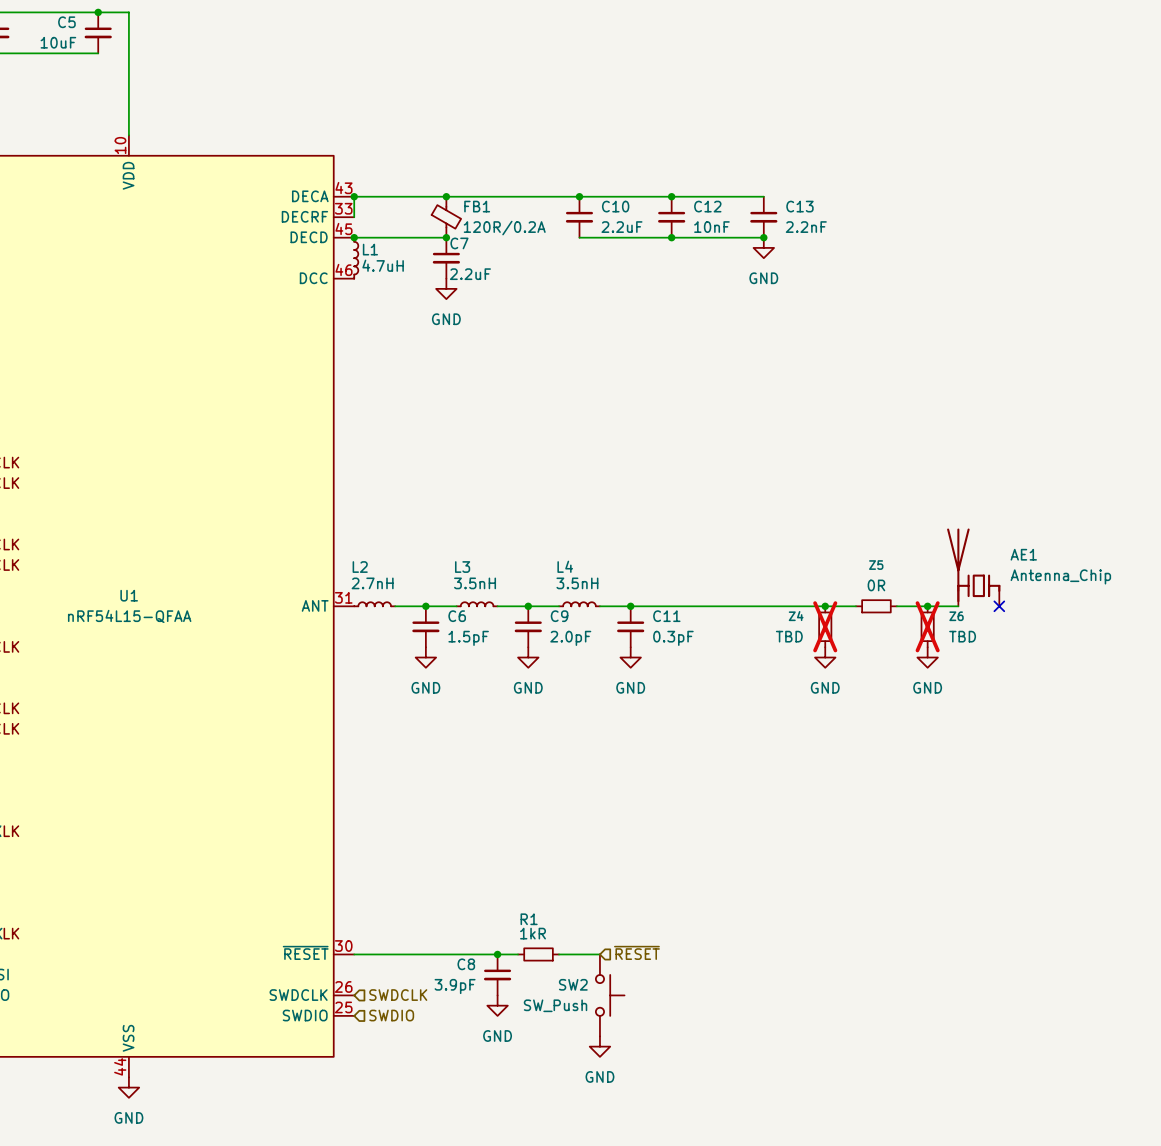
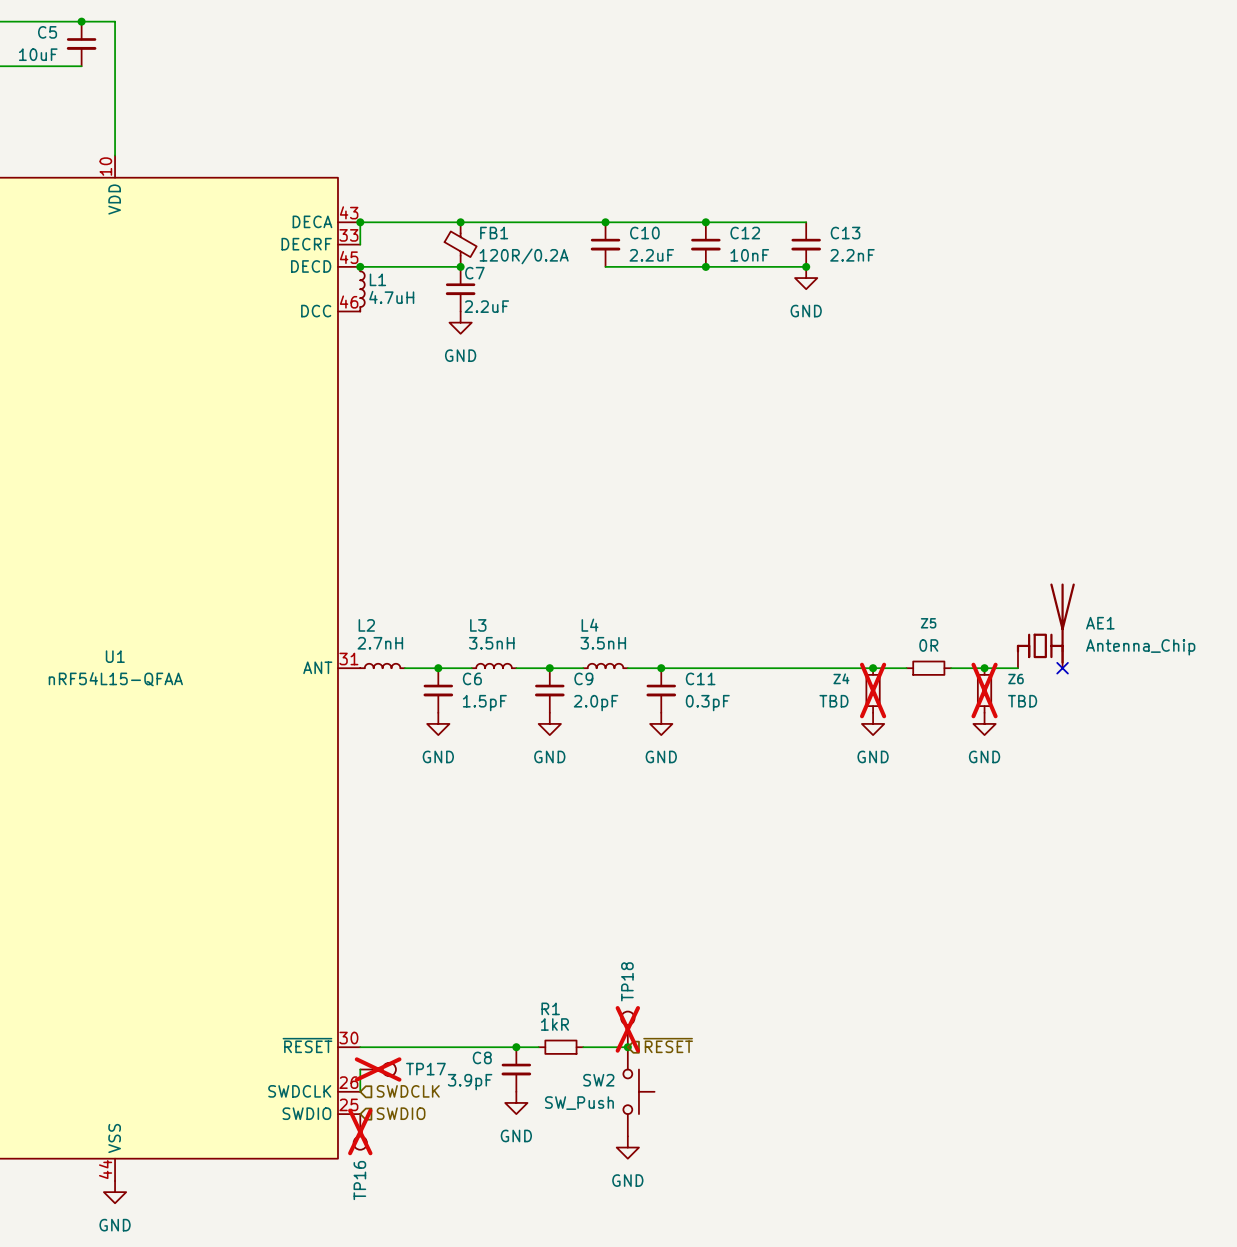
AE1 flip: as is (973, 565) -> left-right (1045, 623)
TP18: none -> (627, 1029)
junction: none -> (627, 1047)
wire: none -> (360, 1069) (360, 1091)
TP17: none -> (378, 1069)
TP16: none -> (360, 1131)

